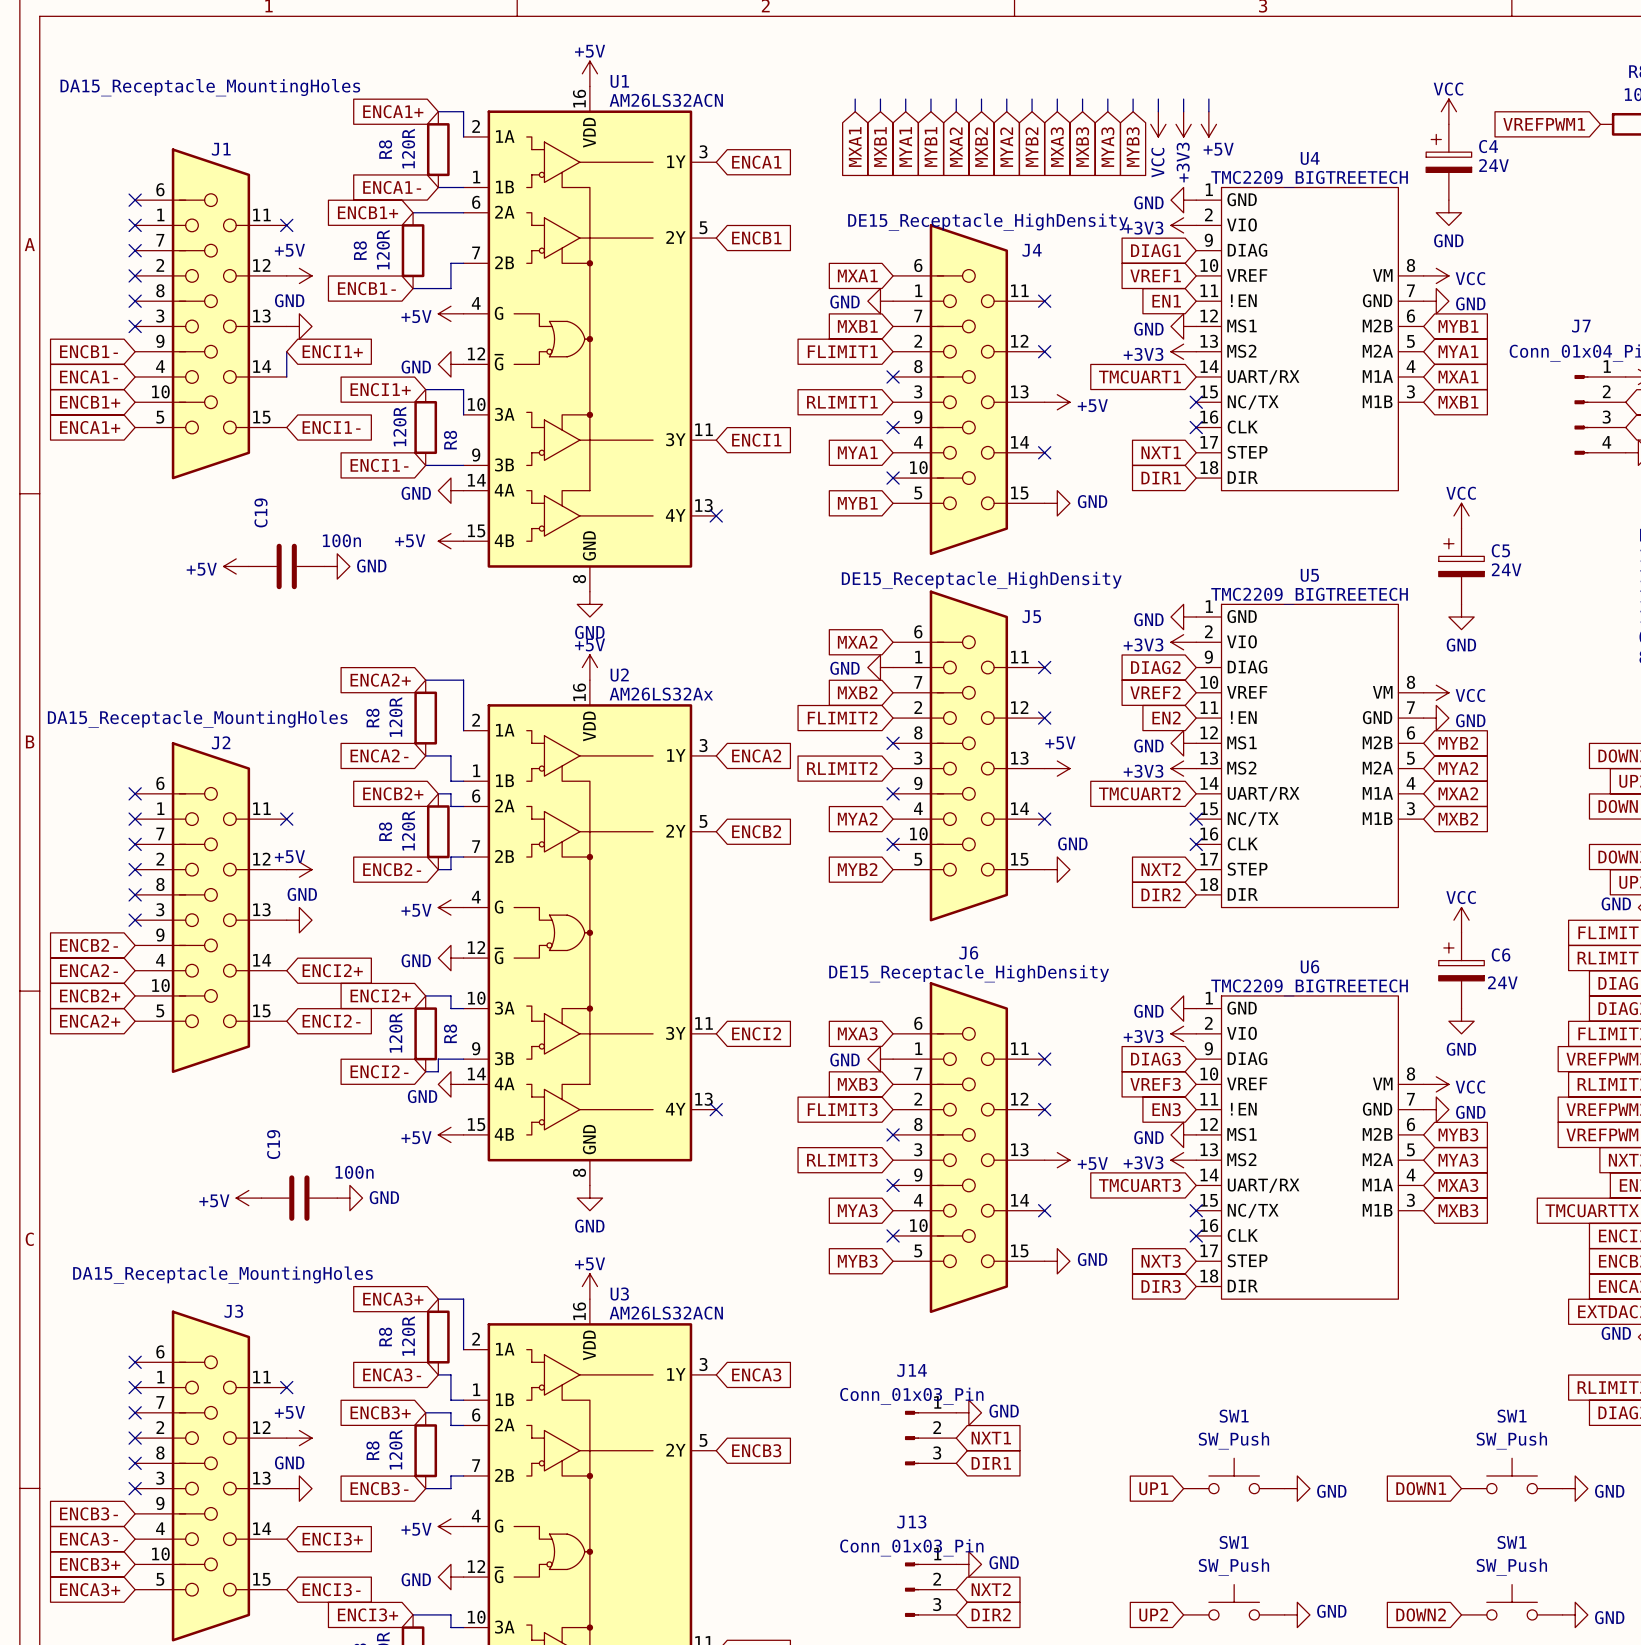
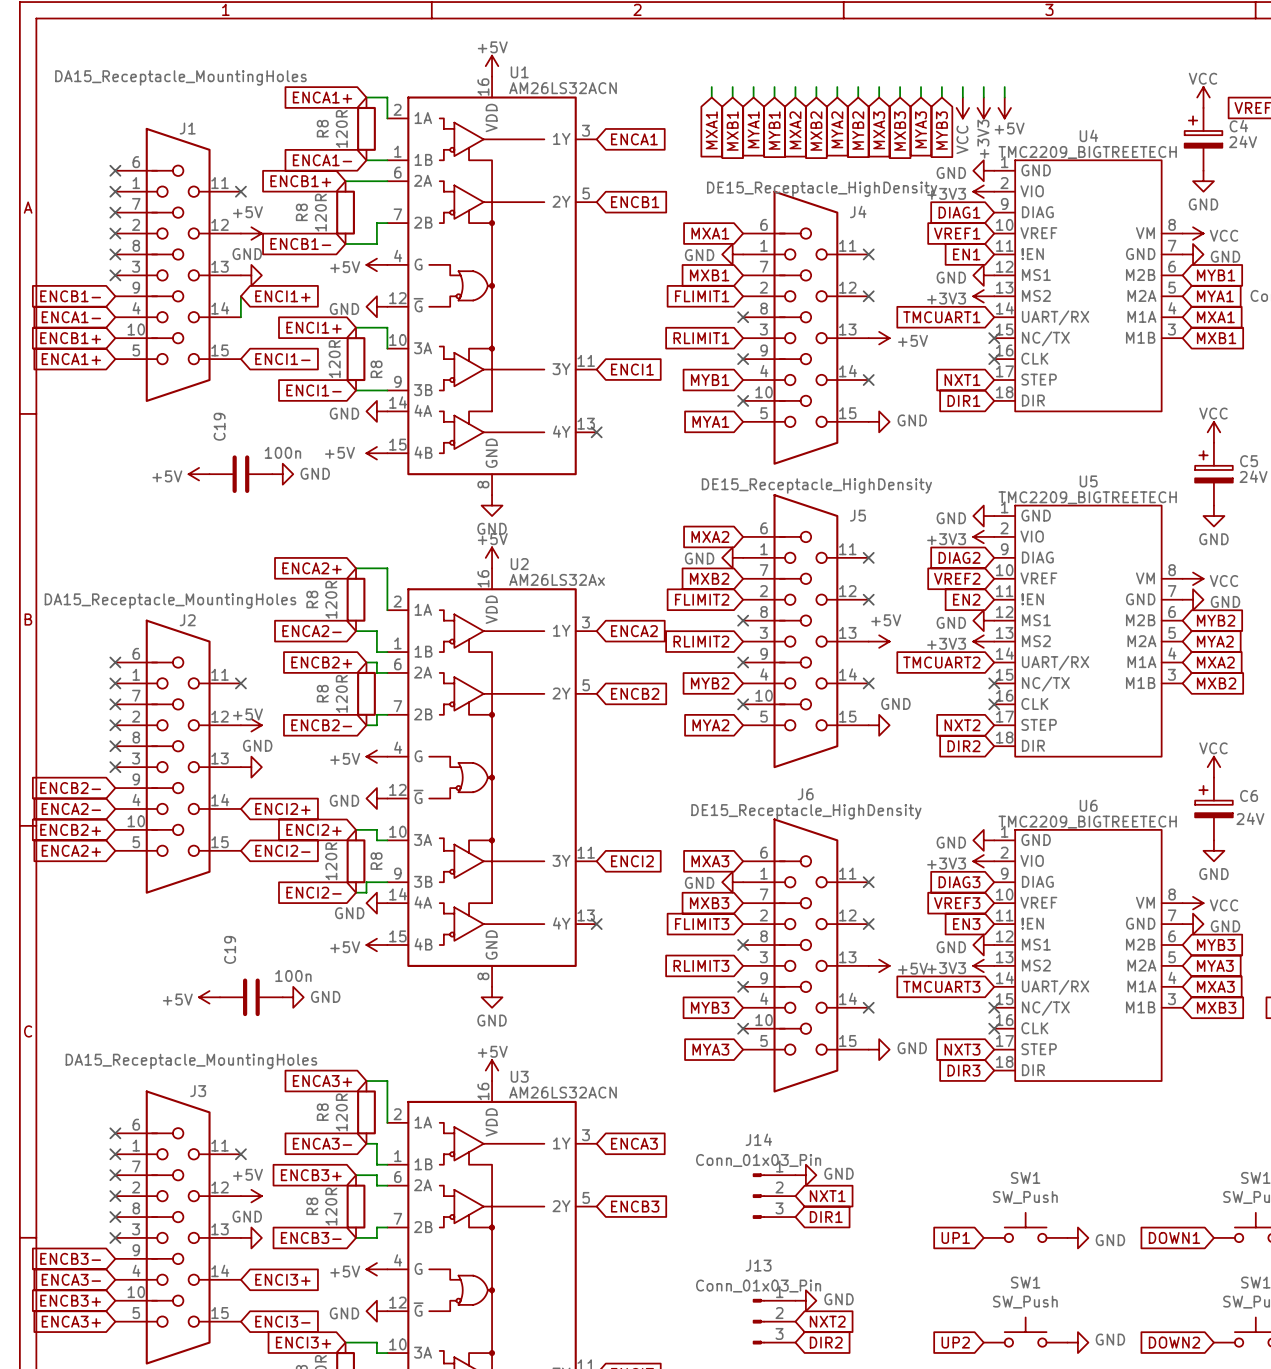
global label: MYA1 (857, 452) -> MYB1 (710, 380)
global label: MYB1 (857, 503) -> MYA1 (710, 421)
global label: MYA2 (857, 819) -> MYB2 (710, 683)
global label: MYB2 (857, 869) -> MYA2 (710, 725)
global label: MYA3 (857, 1210) -> MYB3 (710, 1007)
global label: MYB3 (857, 1261) -> MYA3 (710, 1049)

